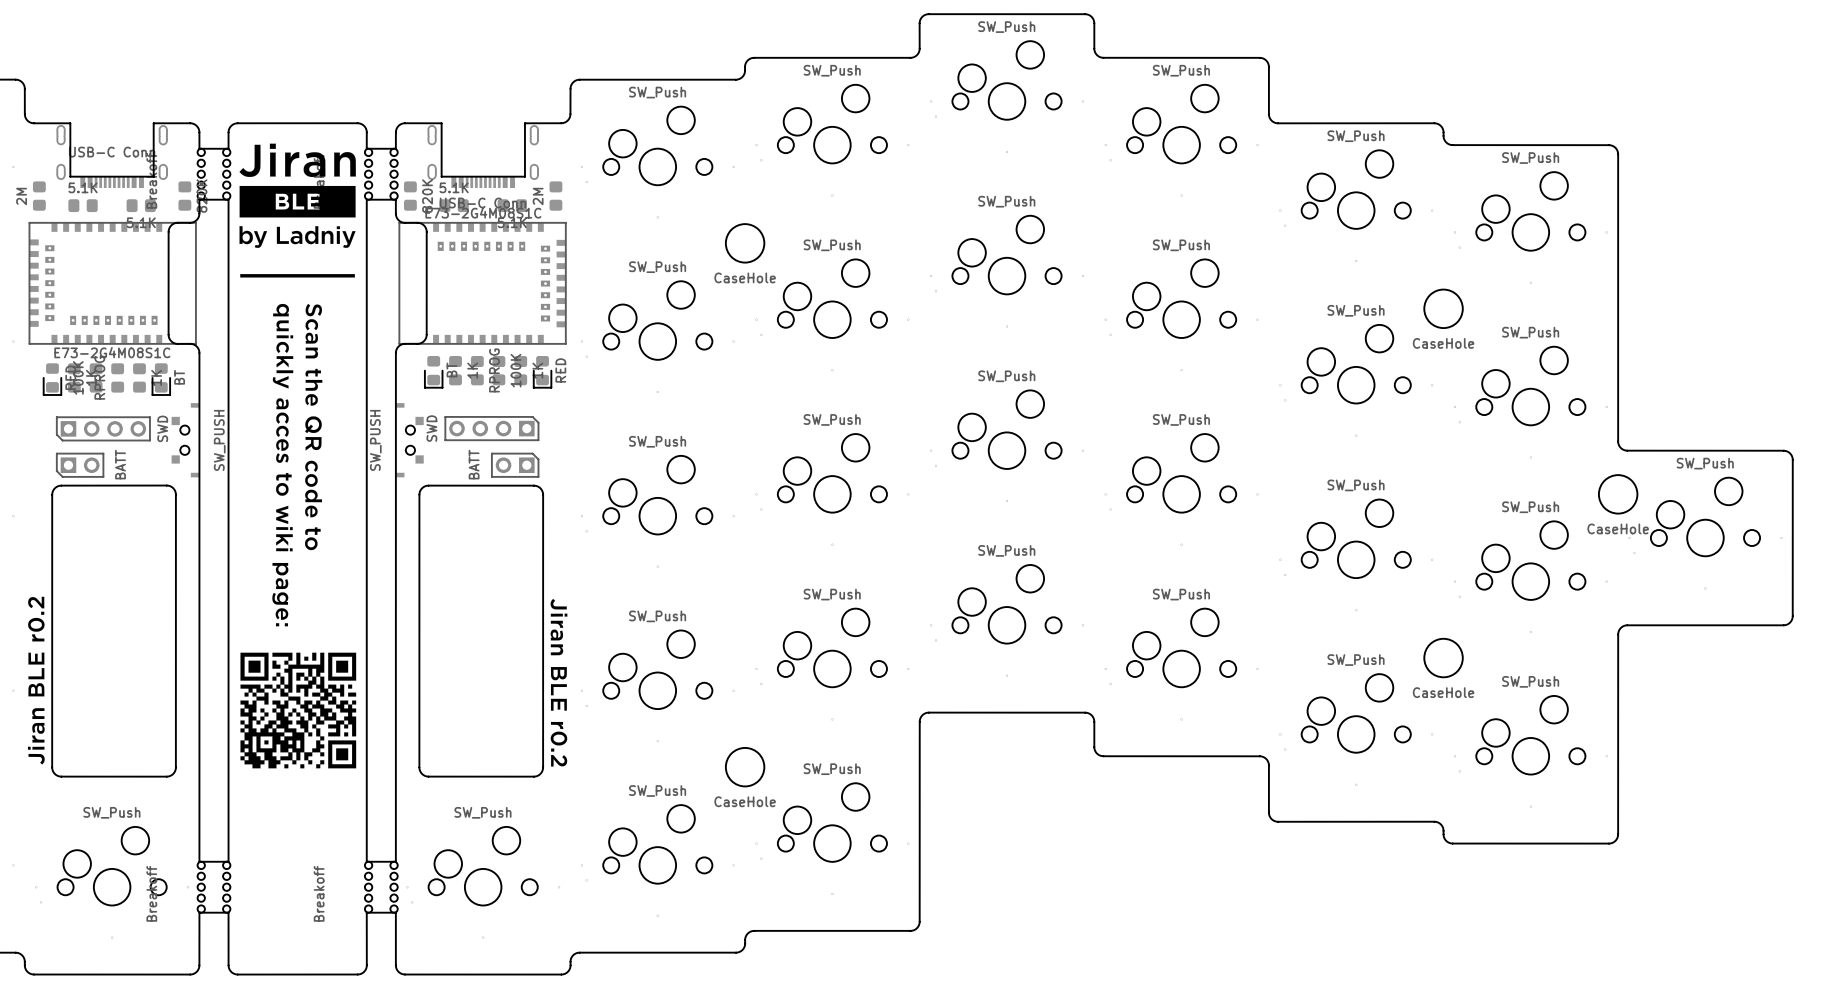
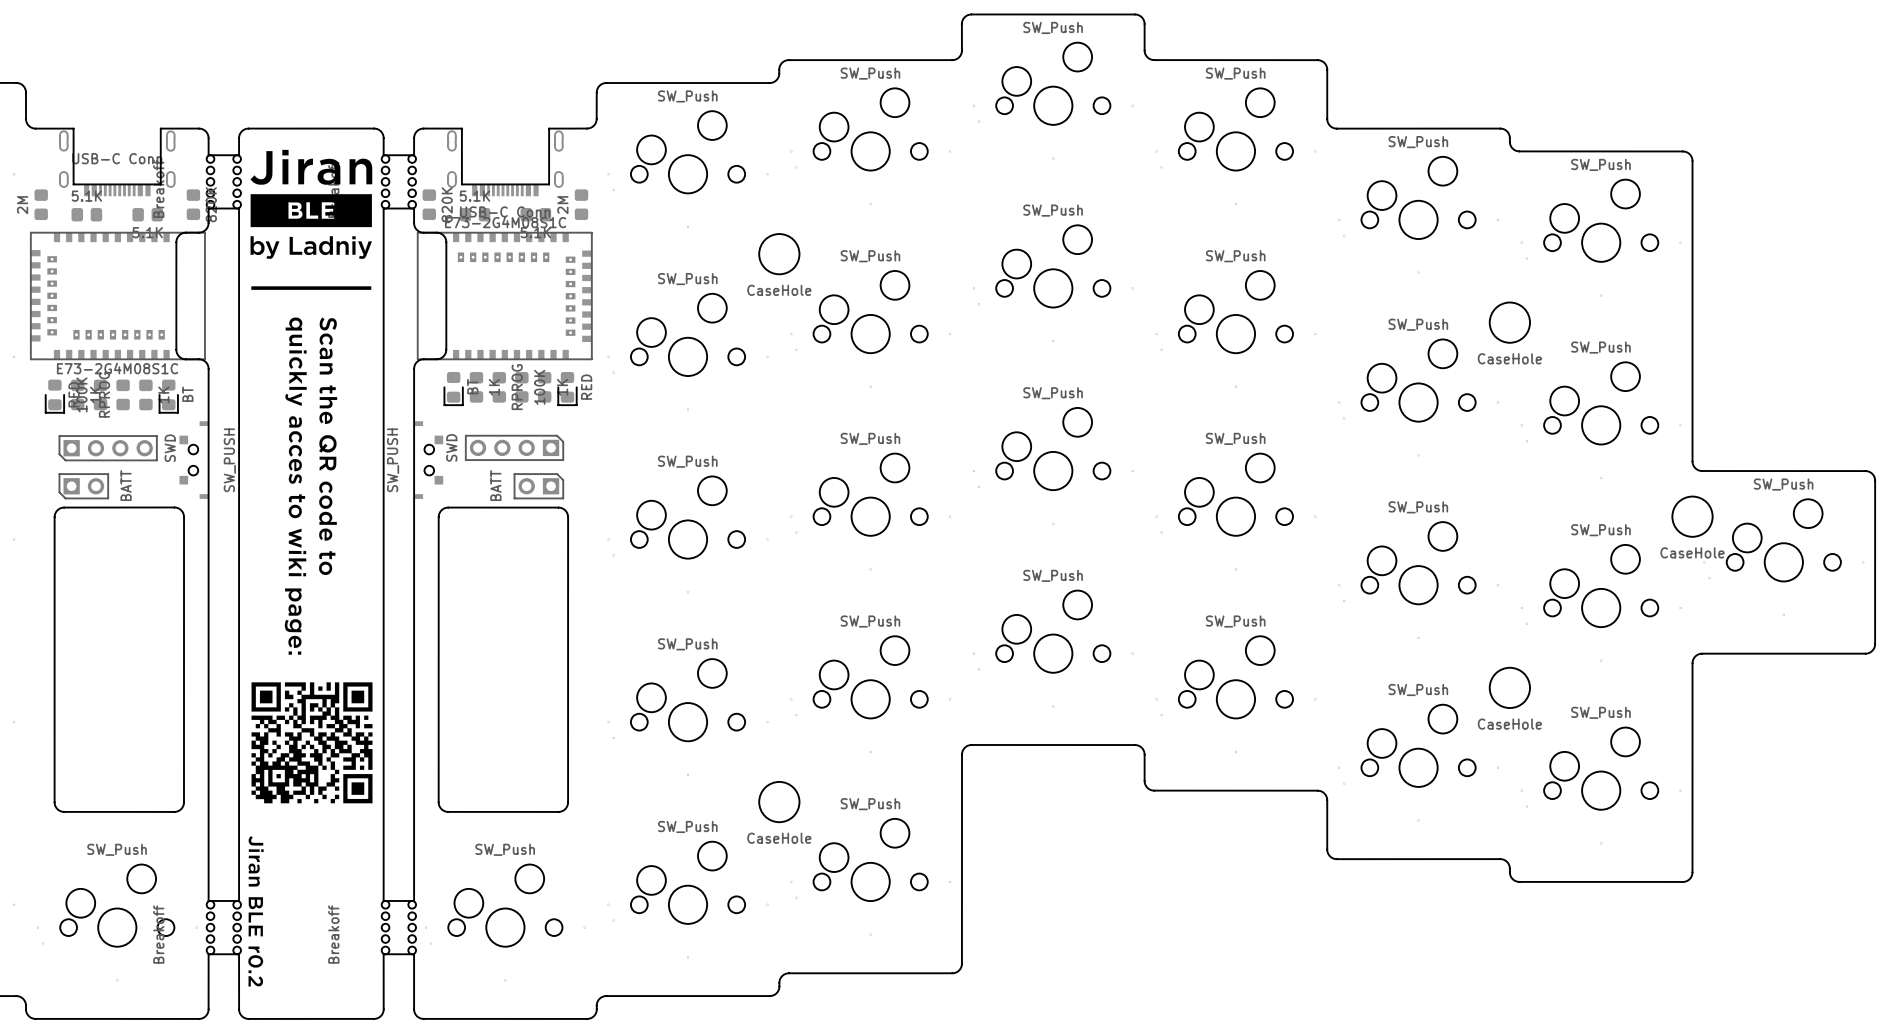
drawing: none -> [248, 149, 373, 987]
drawing: [27, 596, 45, 765] -> none
drawing: [550, 598, 568, 767] -> none

